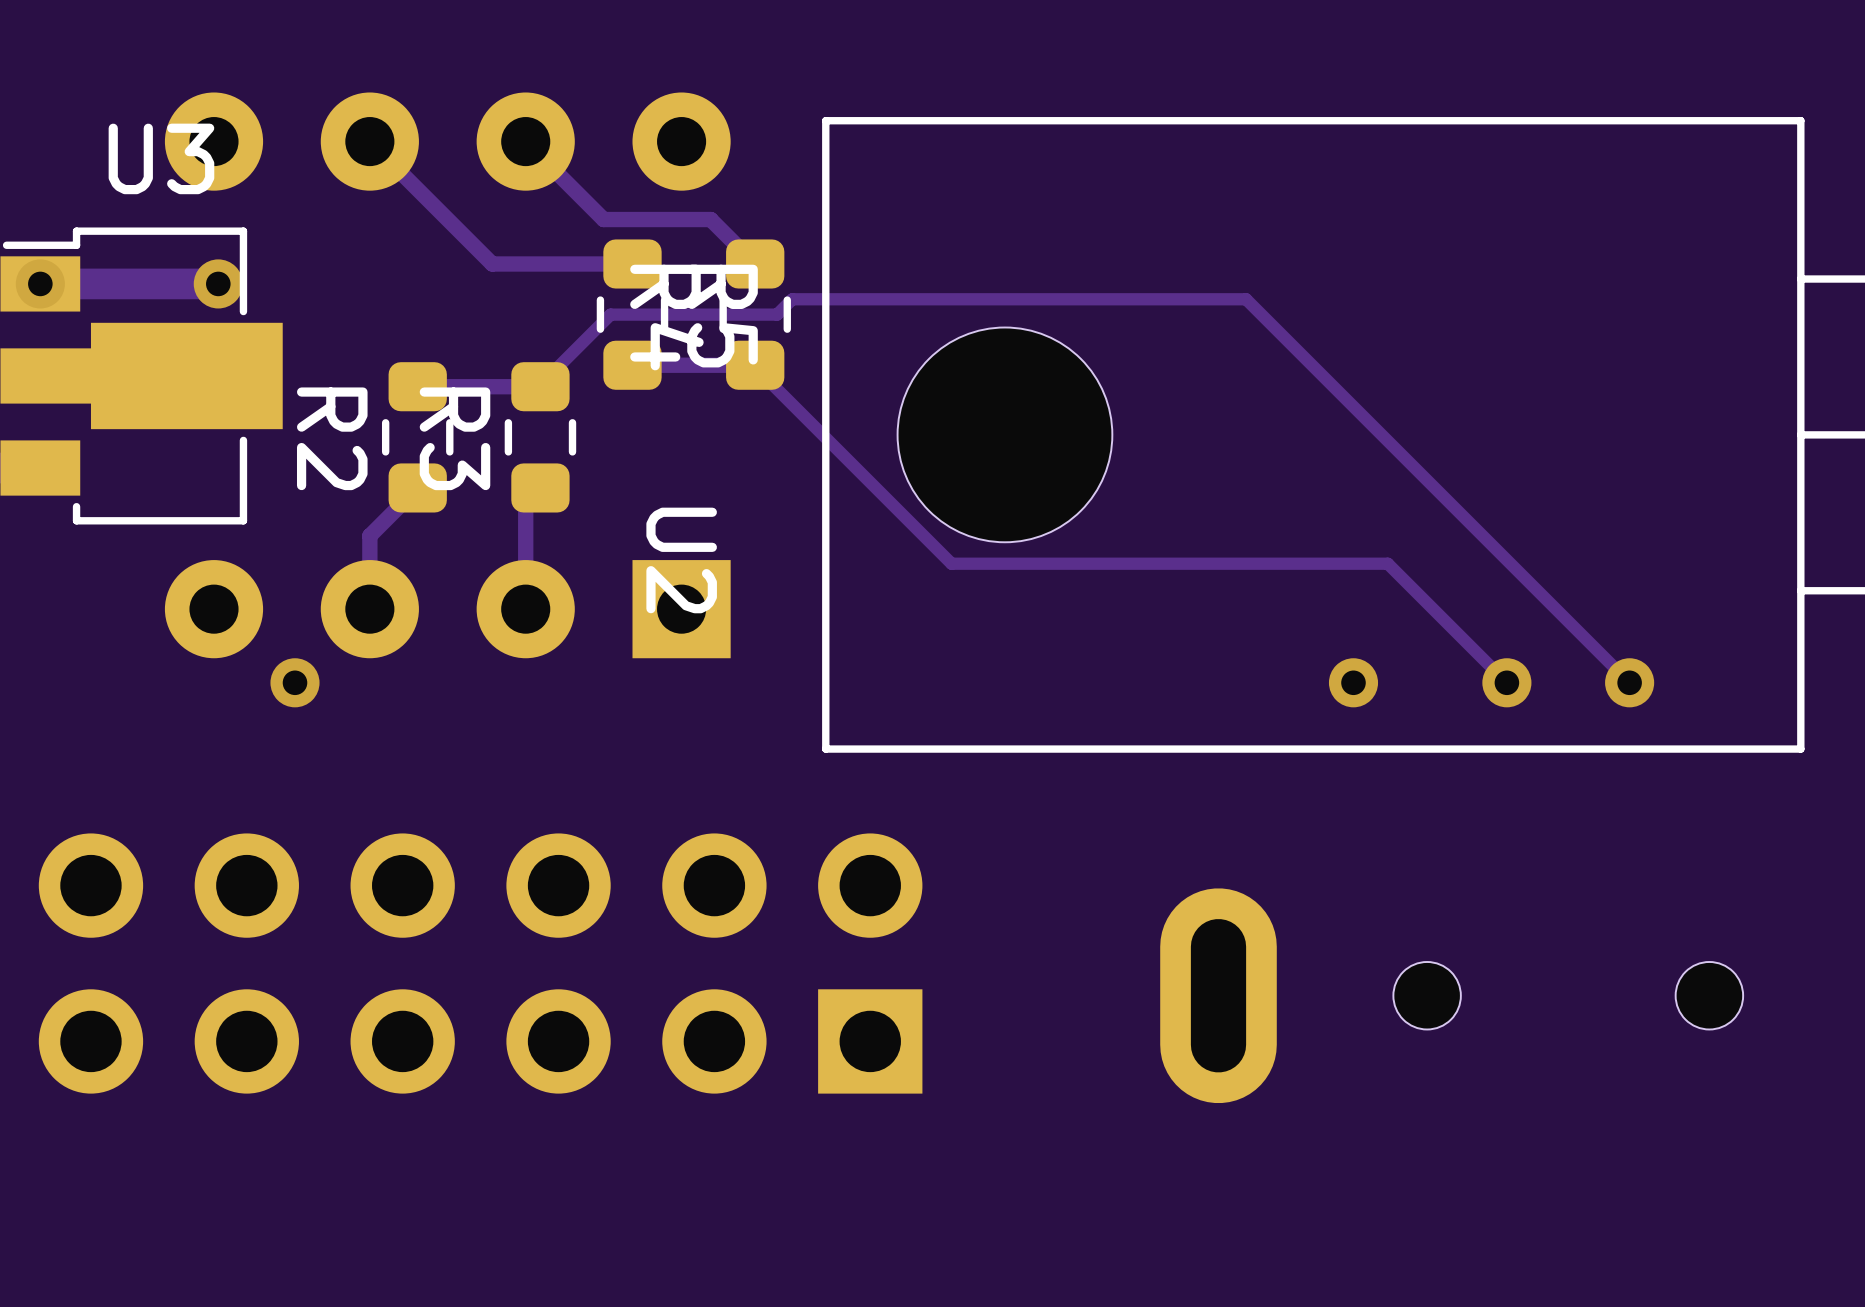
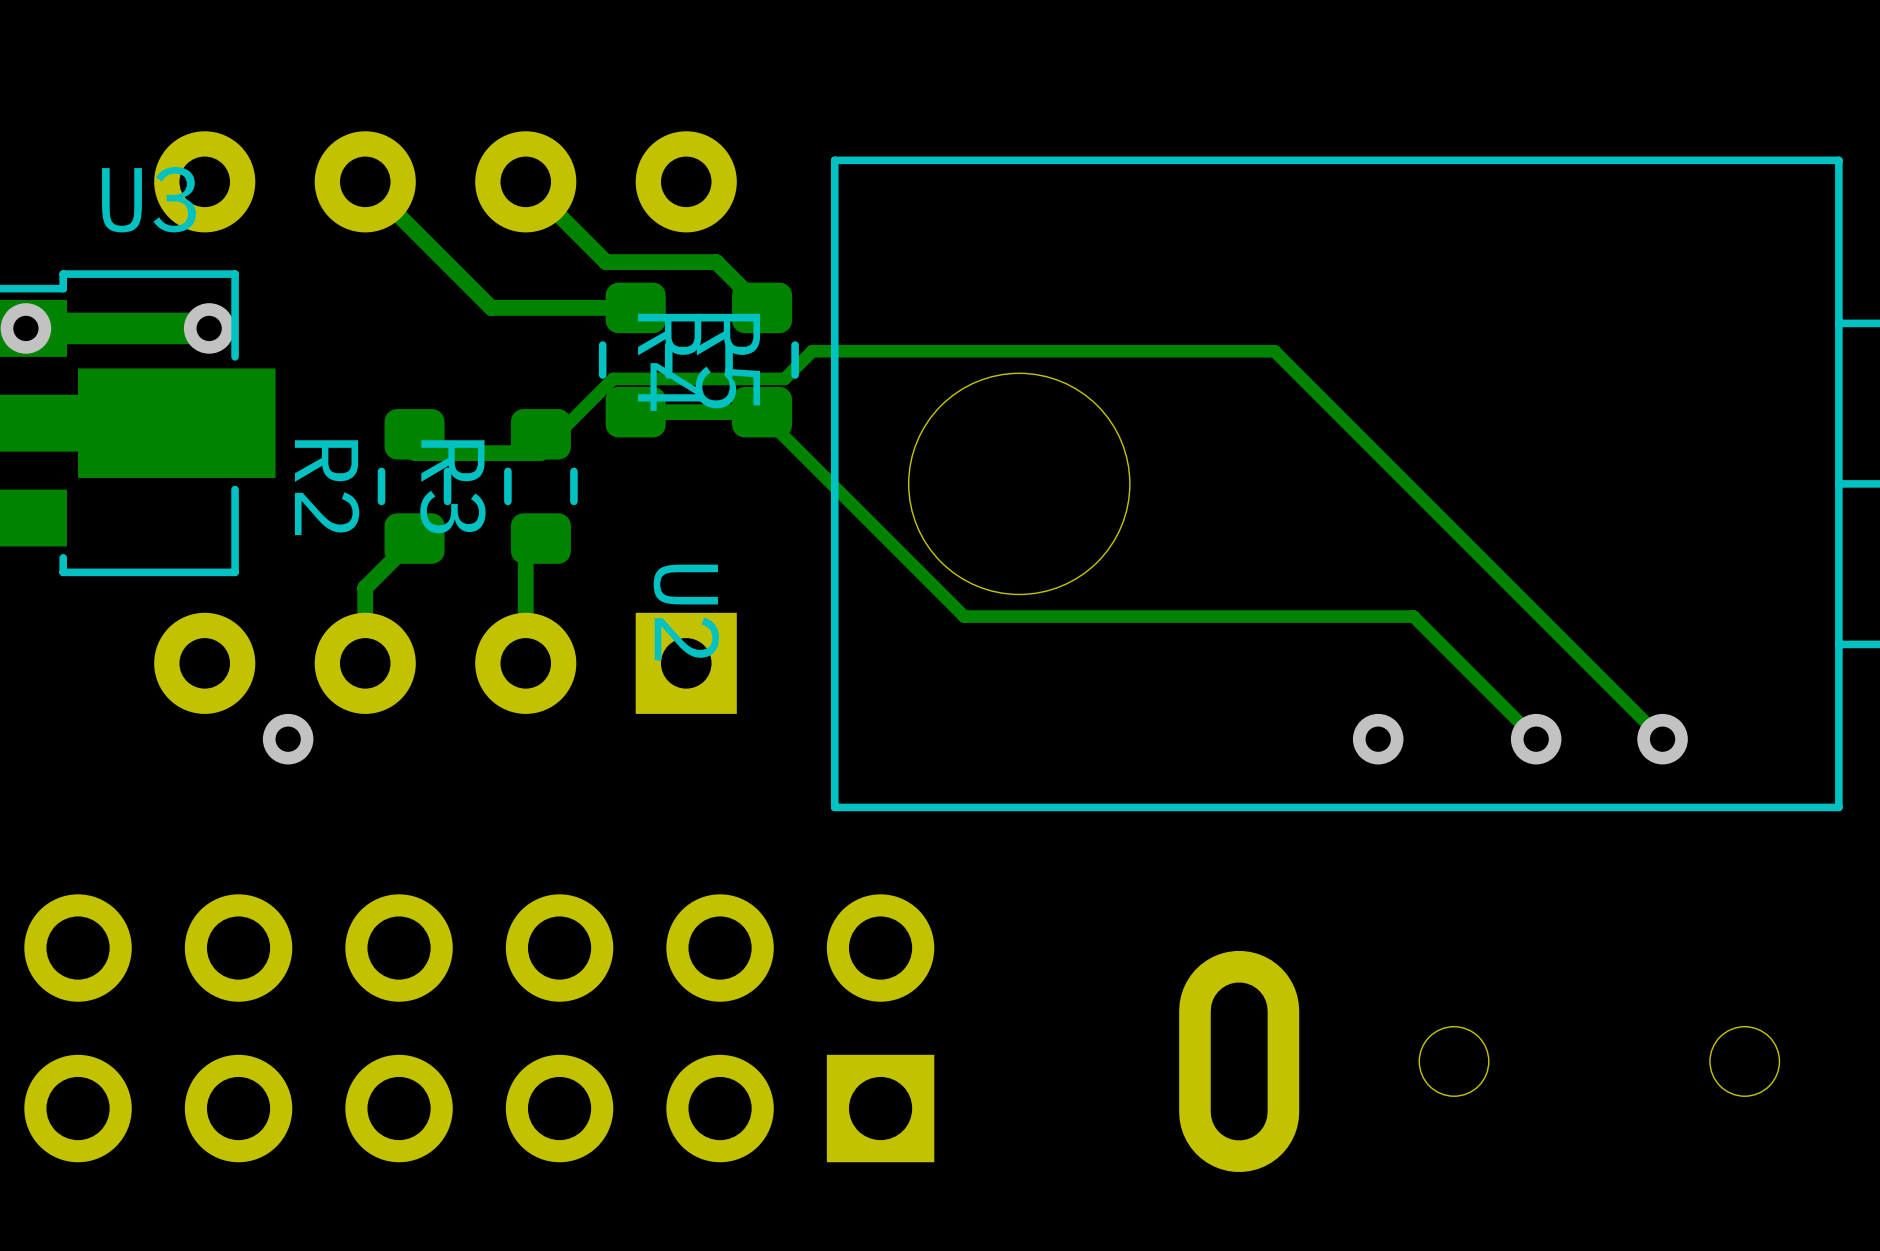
track: (1252, 306) (1246, 299) (792, 299) (777, 314) (610, 314) (540, 386) (417, 386) -> (1274, 351) (812, 351) (784, 378) (613, 378) (540, 453) (414, 453)

